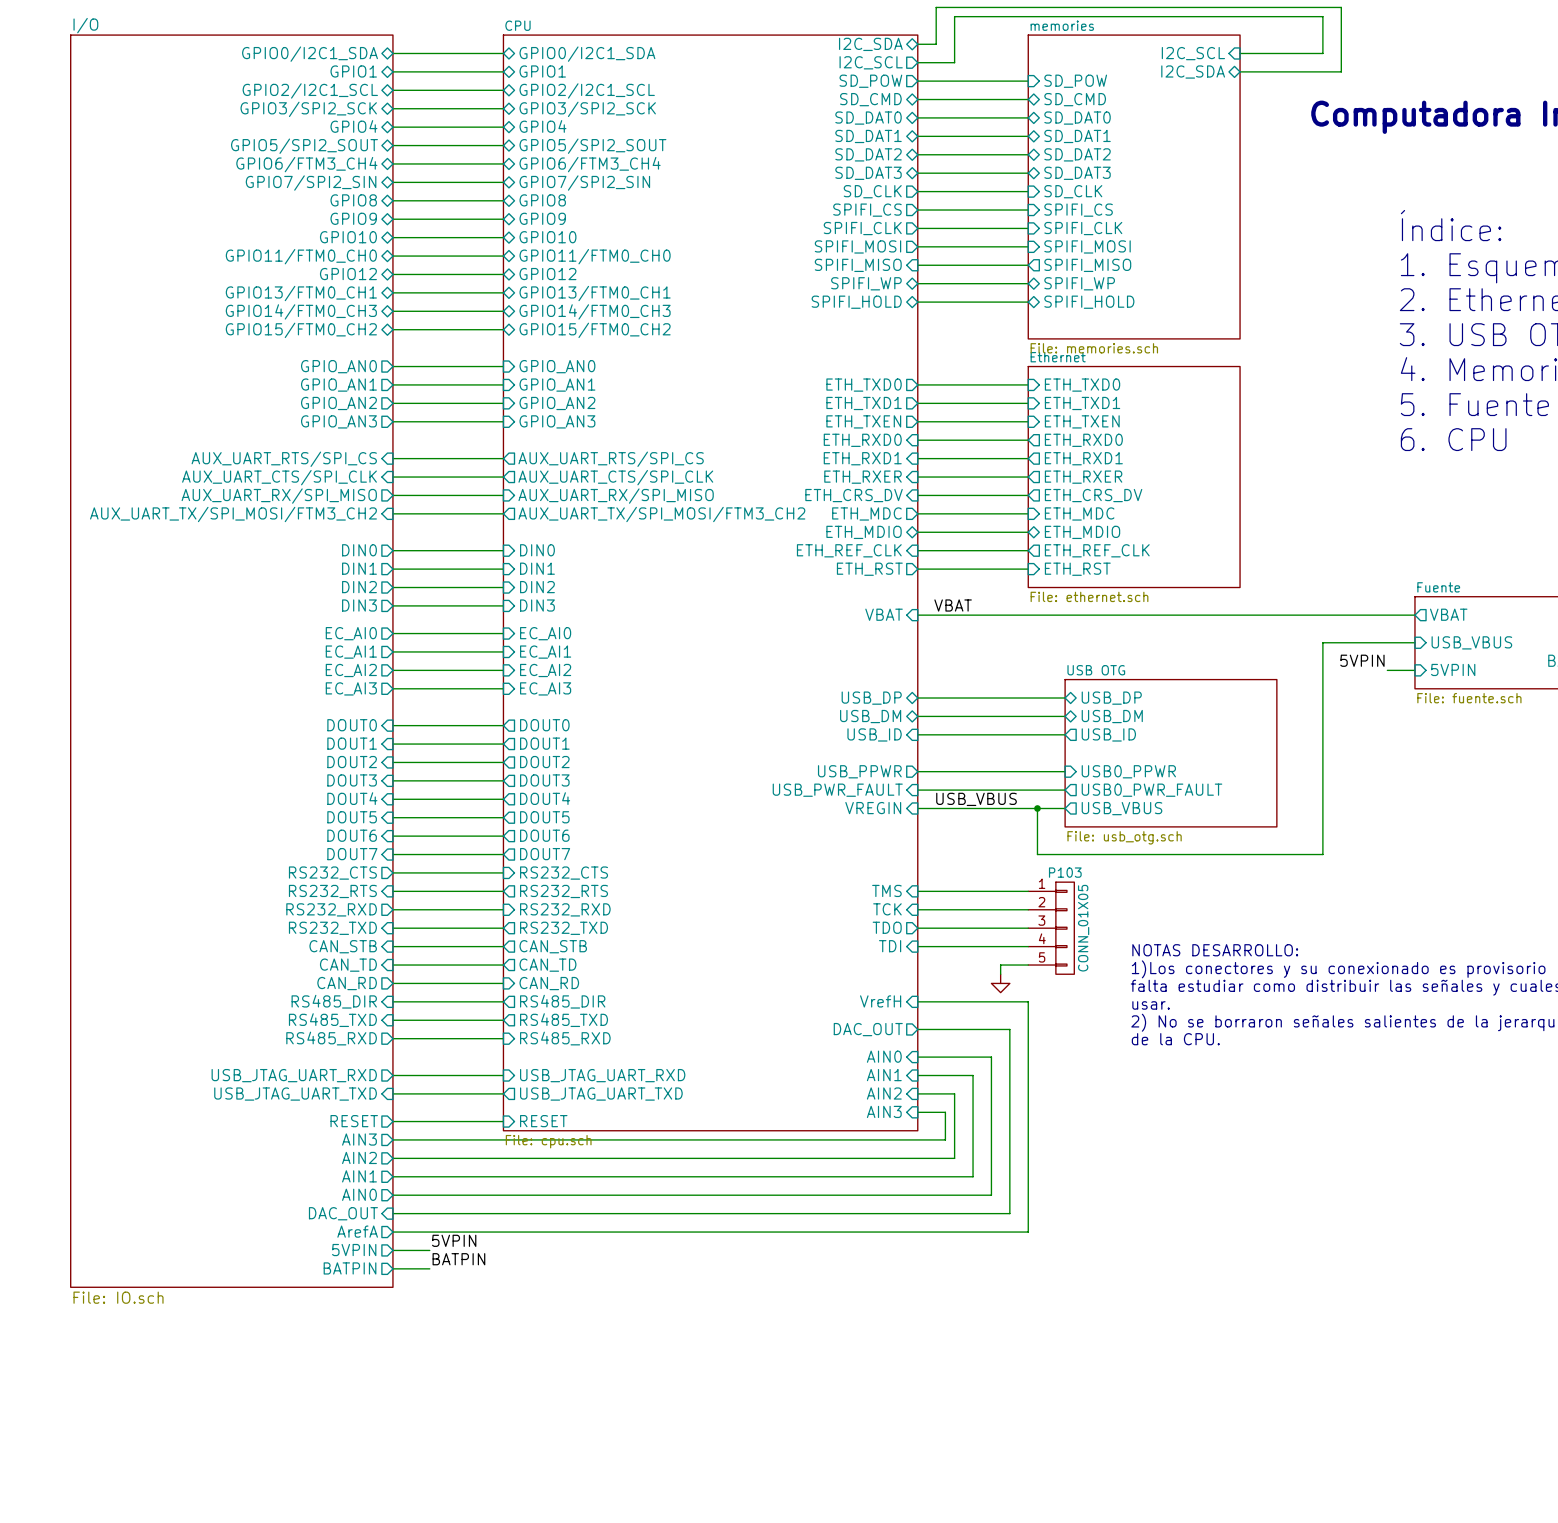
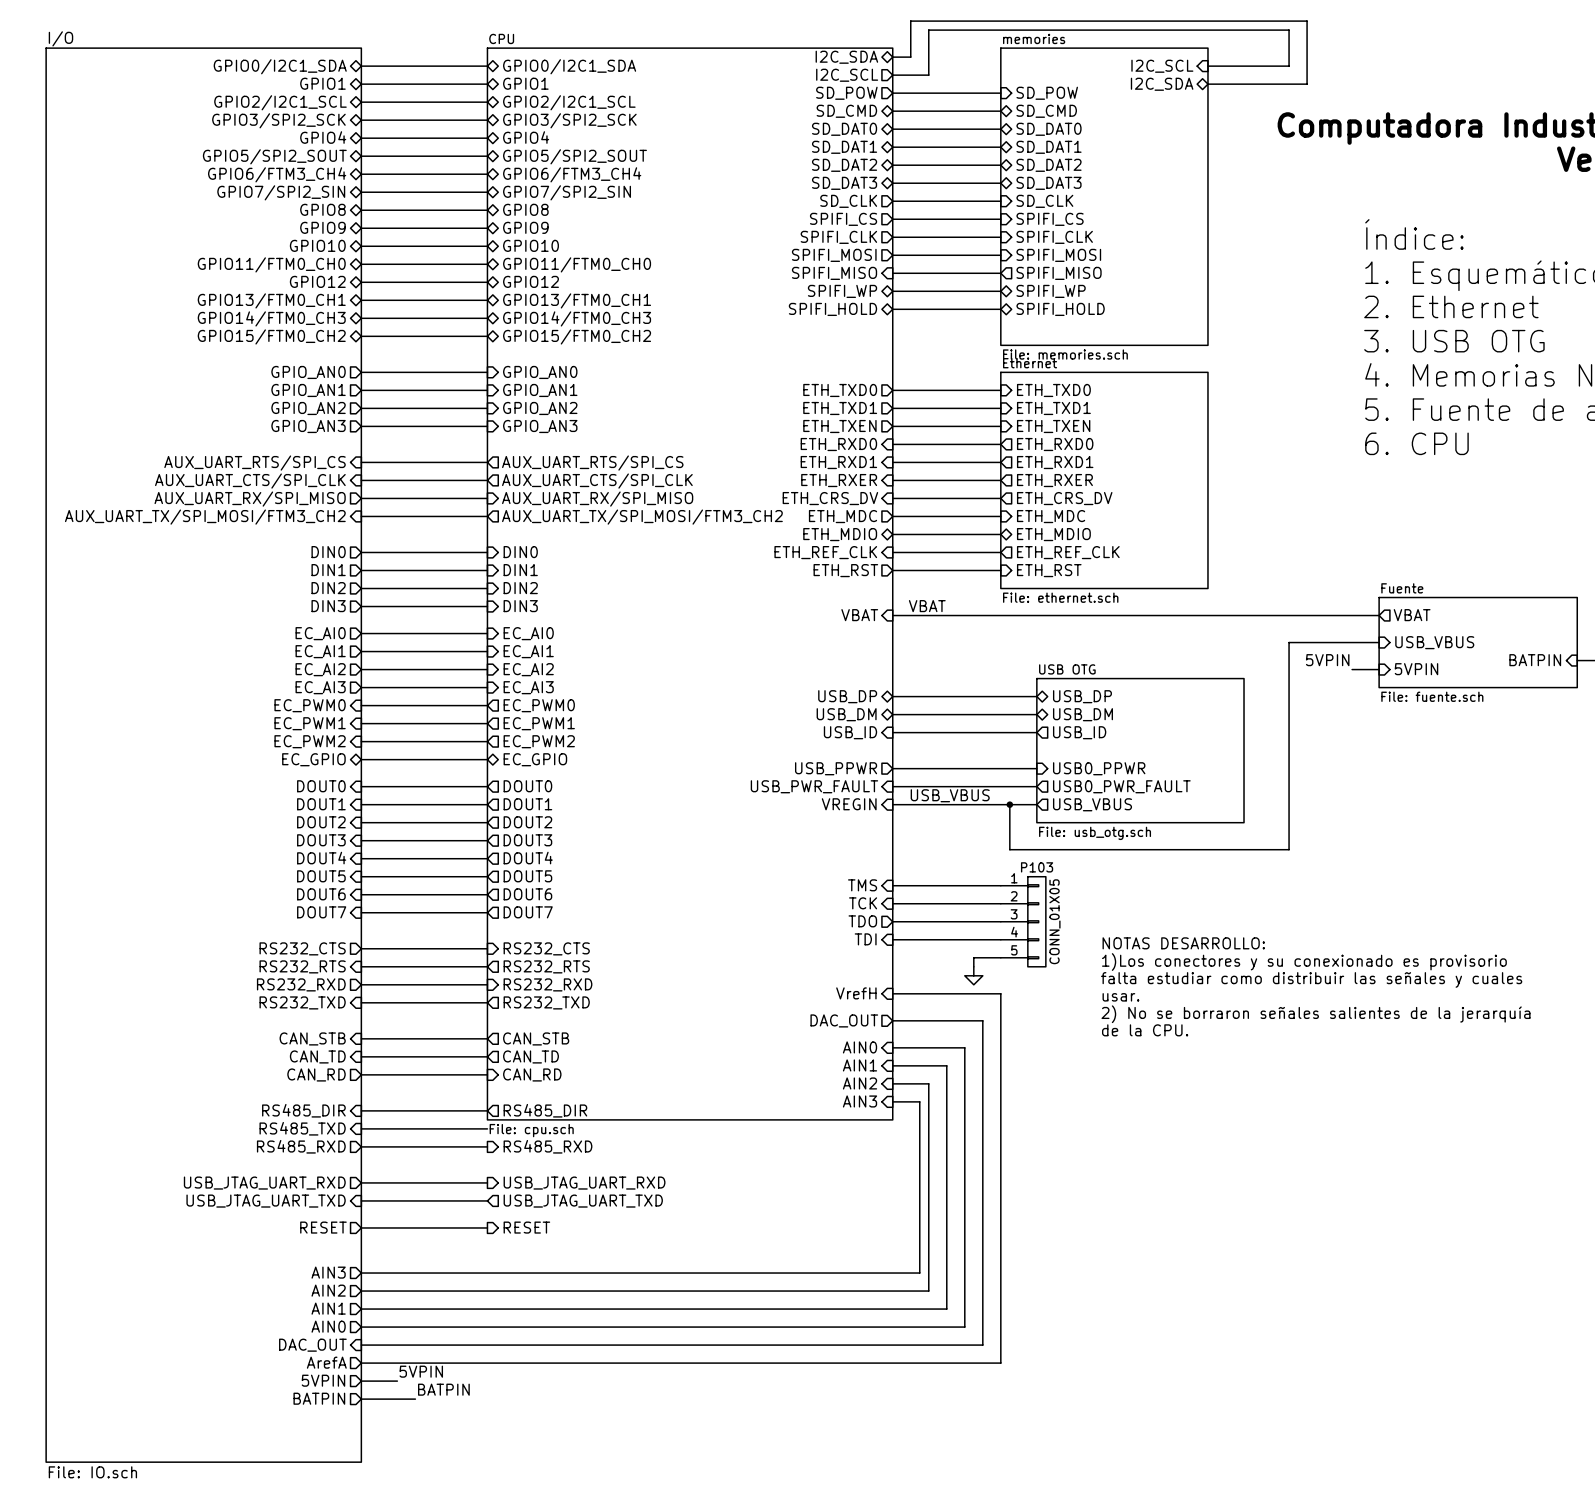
wire: none -> (361, 66) (379, 66)
sheet pin position: GPIO0/I2C1_SDA (310, 54) -> GPIO0/I2C1_SDA (280, 66)
sheet pin position: GPIO1 (353, 71) -> GPIO1 (322, 83)
wire: none -> (361, 84) (379, 84)
sheet pin position: GPIO2/I2C1_SCL (310, 90) -> GPIO2/I2C1_SCL (280, 102)
wire: none -> (361, 102) (379, 102)
wire: none -> (361, 120) (379, 120)
sheet pin position: GPIO3/SPI2_SCK (308, 109) -> GPIO3/SPI2_SCK (278, 120)
sheet pin position: GPIO4 (353, 126) -> GPIO4 (323, 137)
wire: none -> (361, 138) (379, 138)
wire: none -> (361, 156) (379, 156)
sheet pin position: GPIO5/SPI2_SOUT (304, 146) -> GPIO5/SPI2_SOUT (274, 156)
wire: none -> (361, 174) (379, 174)
sheet pin position: GPIO6/FTM3_CH4 (306, 164) -> GPIO6/FTM3_CH4 (277, 174)
wire: none -> (361, 192) (379, 192)
sheet pin position: GPIO7/SPI2_SIN (311, 183) -> GPIO7/SPI2_SIN (281, 192)
sheet pin position: GPIO8 (353, 200) -> GPIO8 (322, 209)
wire: none -> (361, 210) (379, 210)
sheet pin position: GPIO9 (353, 218) -> GPIO9 (322, 227)
wire: none -> (361, 228) (379, 228)
sheet pin position: GPIO10 (348, 237) -> GPIO10 (317, 245)
wire: none -> (361, 246) (379, 246)
sheet pin position: GPIO11/FTM0_CH0 (301, 256) -> GPIO11/FTM0_CH0 (271, 264)
wire: none -> (361, 264) (379, 264)
sheet pin position: GPIO12 (348, 274) -> GPIO12 (317, 281)
wire: none -> (361, 282) (379, 282)
wire: none -> (361, 300) (379, 300)
sheet pin position: GPIO13/FTM0_CH1 (301, 293) -> GPIO13/FTM0_CH1 (271, 300)
sheet pin position: GPIO14/FTM0_CH3 (301, 311) -> GPIO14/FTM0_CH3 (271, 318)
wire: none -> (361, 318) (379, 318)
wire: none -> (361, 336) (379, 336)
sheet pin position: GPIO15/FTM0_CH2 (301, 330) -> GPIO15/FTM0_CH2 (271, 336)
sheet pin position: GPIO_AN0 (338, 366) -> GPIO_AN0 (308, 372)
wire: none -> (361, 372) (379, 372)
wire: none -> (361, 390) (379, 390)
sheet pin position: GPIO_AN1 (338, 385) -> GPIO_AN1 (308, 390)
sheet pin position: GPIO_AN2 (338, 403) -> GPIO_AN2 (308, 408)
wire: none -> (361, 408) (379, 408)
sheet pin position: GPIO_AN3 (338, 421) -> GPIO_AN3 (308, 426)
wire: none -> (361, 426) (379, 426)
wire: none -> (361, 462) (379, 462)
sheet pin position: AUX_UART_RTS/SPI_CS (284, 459) -> AUX_UART_RTS/SPI_CS (255, 463)
sheet pin position: AUX_UART_CTS/SPI_CLK (279, 477) -> AUX_UART_CTS/SPI_CLK (250, 481)
wire: none -> (361, 480) (379, 480)
wire: none -> (361, 498) (379, 498)
sheet pin position: AUX_UART_RX/SPI_MISO (279, 496) -> AUX_UART_RX/SPI_MISO (250, 499)
wire: none -> (361, 516) (379, 516)
sheet pin position: AUX_UART_TX/SPI_MOSI/FTM3_CH2 (233, 514) -> AUX_UART_TX/SPI_MOSI/FTM3_CH2 (205, 517)
sheet pin position: DIN0 (359, 550) -> DIN0 (328, 552)
wire: none -> (361, 552) (379, 552)
sheet pin position: DIN1 (359, 568) -> DIN1 (328, 570)
wire: none -> (361, 570) (379, 570)
sheet pin position: DIN2 (359, 587) -> DIN2 (328, 588)
wire: none -> (361, 588) (379, 588)
sheet pin position: DIN3 (359, 605) -> DIN3 (328, 606)
wire: none -> (361, 606) (379, 606)
sheet pin position: EC_AI0 (351, 633) -> EC_AI0 (320, 633)
wire: none -> (361, 633) (379, 633)
wire: none -> (361, 651) (379, 651)
sheet pin position: EC_AI1 (351, 652) -> EC_AI1 (320, 651)
sheet I/O: File: IO.sch (231, 661) -> none
sheet pin position: EC_AI2 (351, 670) -> EC_AI2 (320, 669)
wire: none -> (361, 669) (379, 669)
sheet pin position: EC_AI3 (351, 688) -> EC_AI3 (320, 687)
wire: none -> (361, 687) (379, 687)
sheet pin: none -> EC_PWM0 (310, 705)
wire: none -> (361, 705) (487, 705)
sheet pin: none -> EC_PWM0 (539, 705)
sheet pin: none -> EC_PWM1 (310, 723)
sheet pin position: DOUT0 (352, 725) -> DOUT0 (321, 786)
wire: none -> (361, 723) (379, 723)
sheet pin: DOUT0 (544, 725) -> EC_PWM1 (539, 723)
sheet pin position: DOUT1 (352, 743) -> DOUT1 (321, 804)
sheet pin: DOUT1 (544, 743) -> EC_PWM2 (539, 741)
sheet pin: none -> EC_PWM2 (310, 741)
wire: none -> (361, 741) (379, 741)
sheet I/O: none -> File: IO.sch (203, 755)
sheet pin: none -> EC_GPIO (313, 759)
sheet pin position: DOUT2 (352, 762) -> DOUT2 (321, 822)
wire: none -> (361, 759) (379, 759)
sheet pin shape: output (544, 762) -> bidirectional (535, 759)
sheet pin: DOUT2 (544, 762) -> EC_GPIO (535, 759)
sheet pin position: DOUT3 (352, 780) -> DOUT3 (321, 840)
wire: (392, 780) (503, 780) -> none
sheet pin position: DOUT3 (544, 780) -> DOUT3 (527, 840)
sheet pin: none -> DOUT0 (527, 786)
wire: none -> (361, 786) (487, 786)
sheet pin position: DOUT4 (352, 798) -> DOUT4 (321, 858)
sheet pin position: DOUT4 (545, 798) -> DOUT4 (528, 858)
wire: (392, 799) (503, 799) -> none
wire: none -> (361, 804) (487, 804)
sheet pin: none -> DOUT1 (527, 804)
sheet pin position: DOUT5 (352, 817) -> DOUT5 (321, 876)
wire: (392, 817) (503, 817) -> none
sheet pin position: DOUT5 (544, 817) -> DOUT5 (527, 876)
wire: none -> (361, 822) (487, 822)
sheet pin: none -> DOUT2 (527, 822)
sheet pin position: DOUT6 (352, 835) -> DOUT6 (321, 894)
sheet pin position: DOUT6 (544, 835) -> DOUT6 (527, 894)
wire: (392, 836) (503, 836) -> none
wire: none -> (361, 840) (487, 840)
sheet pin position: DOUT7 (352, 854) -> DOUT7 (321, 912)
wire: (392, 854) (503, 854) -> none
sheet pin position: DOUT7 (545, 854) -> DOUT7 (528, 912)
wire: none -> (361, 858) (487, 858)
wire: (392, 872) (503, 872) -> none
sheet pin: RS232_CTS (332, 873) -> none
sheet pin: RS232_CTS (564, 873) -> none
wire: none -> (361, 876) (487, 876)
sheet pin: RS232_RTS (332, 891) -> none
wire: (392, 891) (503, 891) -> none
sheet pin: RS232_RTS (564, 891) -> none
wire: none -> (361, 894) (487, 894)
sheet pin: RS232_RXD (331, 909) -> none
wire: (392, 909) (503, 909) -> none
sheet pin: RS232_RXD (565, 909) -> none
wire: none -> (361, 912) (487, 912)
sheet pin: RS232_TXD (332, 928) -> none
wire: (392, 928) (503, 928) -> none
sheet pin: RS232_TXD (564, 928) -> none
sheet pin: CAN_STB (343, 946) -> none
wire: (392, 946) (503, 946) -> none
sheet pin: CAN_STB (553, 946) -> none
sheet pin: none -> RS232_CTS (302, 948)
wire: none -> (361, 948) (487, 948)
sheet pin: none -> RS232_CTS (546, 948)
sheet pin: CAN_TD (348, 965) -> none
wire: (392, 965) (503, 965) -> none
sheet pin: CAN_TD (547, 965) -> none
sheet pin: none -> RS232_RTS (302, 966)
wire: none -> (361, 966) (487, 966)
sheet pin: none -> RS232_RTS (546, 966)
sheet pin: CAN_RD (347, 983) -> none
wire: (392, 983) (503, 983) -> none
sheet pin: CAN_RD (549, 983) -> none
sheet pin: none -> RS232_RXD (301, 984)
wire: none -> (361, 984) (487, 984)
sheet pin: none -> RS232_RXD (547, 984)
sheet pin: RS485_DIR (334, 1001) -> none
wire: (392, 1001) (503, 1001) -> none
sheet pin: RS485_DIR (562, 1001) -> none
wire: none -> (361, 1002) (487, 1002)
sheet pin: RS485_TXD (332, 1020) -> RS232_TXD (302, 1002)
wire: (392, 1020) (503, 1020) -> none
sheet pin: RS485_TXD (564, 1020) -> RS232_TXD (546, 1002)
sheet pin: RS485_RXD (331, 1038) -> none
wire: (392, 1038) (503, 1038) -> none
sheet pin: RS485_RXD (565, 1038) -> none
sheet pin: none -> CAN_STB (312, 1038)
wire: none -> (361, 1038) (487, 1038)
sheet pin: none -> CAN_STB (536, 1038)
sheet pin: none -> CAN_TD (317, 1056)
wire: none -> (361, 1056) (487, 1056)
sheet pin: none -> CAN_TD (531, 1056)
sheet pin: USB_JTAG_UART_RXD (294, 1075) -> none
wire: (392, 1075) (503, 1075) -> none
sheet pin: USB_JTAG_UART_RXD (602, 1075) -> none
sheet pin: none -> CAN_RD (316, 1074)
wire: none -> (361, 1074) (487, 1074)
sheet pin: none -> CAN_RD (532, 1074)
wire: (392, 1093) (503, 1093) -> none
sheet pin: USB_JTAG_UART_TXD (295, 1094) -> none
sheet pin: USB_JTAG_UART_TXD (601, 1094) -> none
sheet pin: none -> RS485_DIR (303, 1110)
sheet pin: RESET (354, 1121) -> none
wire: none -> (361, 1110) (379, 1110)
sheet pin shape: input (543, 1121) -> output (545, 1110)
sheet pin: RESET (543, 1121) -> RS485_DIR (545, 1110)
sheet pin: none -> RS485_TXD (302, 1128)
sheet pin position: AIN3 (359, 1139) -> AIN3 (328, 1272)
wire: none -> (361, 1128) (379, 1128)
wire: (503, 1139) (945, 1139) -> (361, 1273) (919, 1273) (919, 1128)
sheet pin position: AIN2 (359, 1157) -> AIN2 (328, 1290)
sheet pin: none -> RS485_RXD (301, 1146)
wire: none -> (361, 1146) (379, 1146)
wire: (503, 1158) (954, 1158) -> (361, 1291) (928, 1291) (928, 1146)
sheet pin: none -> RS485_RXD (547, 1146)
sheet pin position: AIN1 (359, 1176) -> AIN1 (328, 1308)
wire: (392, 1176) (973, 1176) -> (361, 1309) (946, 1309) (946, 1164)
sheet pin position: AIN0 (359, 1194) -> AIN0 (328, 1326)
sheet pin: none -> USB_JTAG_UART_RXD (264, 1183)
wire: none -> (361, 1182) (379, 1182)
wire: (503, 1195) (991, 1195) -> (361, 1327) (964, 1327) (964, 1182)
sheet pin: none -> USB_JTAG_UART_RXD (584, 1183)
sheet pin: none -> USB_JTAG_UART_TXD (266, 1201)
sheet pin position: DAC_OUT (343, 1213) -> DAC_OUT (312, 1345)
wire: none -> (361, 1200) (379, 1200)
wire: (503, 1213) (1009, 1213) -> (361, 1345) (982, 1345) (982, 1200)
sheet pin: none -> USB_JTAG_UART_TXD (583, 1201)
sheet pin position: ArefA (357, 1231) -> ArefA (326, 1362)
wire: (392, 1232) (1028, 1232) -> (361, 1363) (1000, 1363) (1000, 1218)
sheet pin: none -> RESET (323, 1227)
label position: 5VPIN (454, 1240) -> 5VPIN (421, 1371)
sheet pin: none -> RESET (526, 1227)
wire: none -> (361, 1227) (487, 1227)
sheet pin position: 5VPIN (354, 1250) -> 5VPIN (323, 1380)
wire: (392, 1250) (429, 1250) -> none
label position: BATPIN (458, 1259) -> BATPIN (443, 1389)
sheet pin position: BATPIN (350, 1268) -> BATPIN (319, 1398)
wire: (392, 1268) (429, 1268) -> (361, 1381) (397, 1381)
wire: none -> (361, 1399) (415, 1399)

